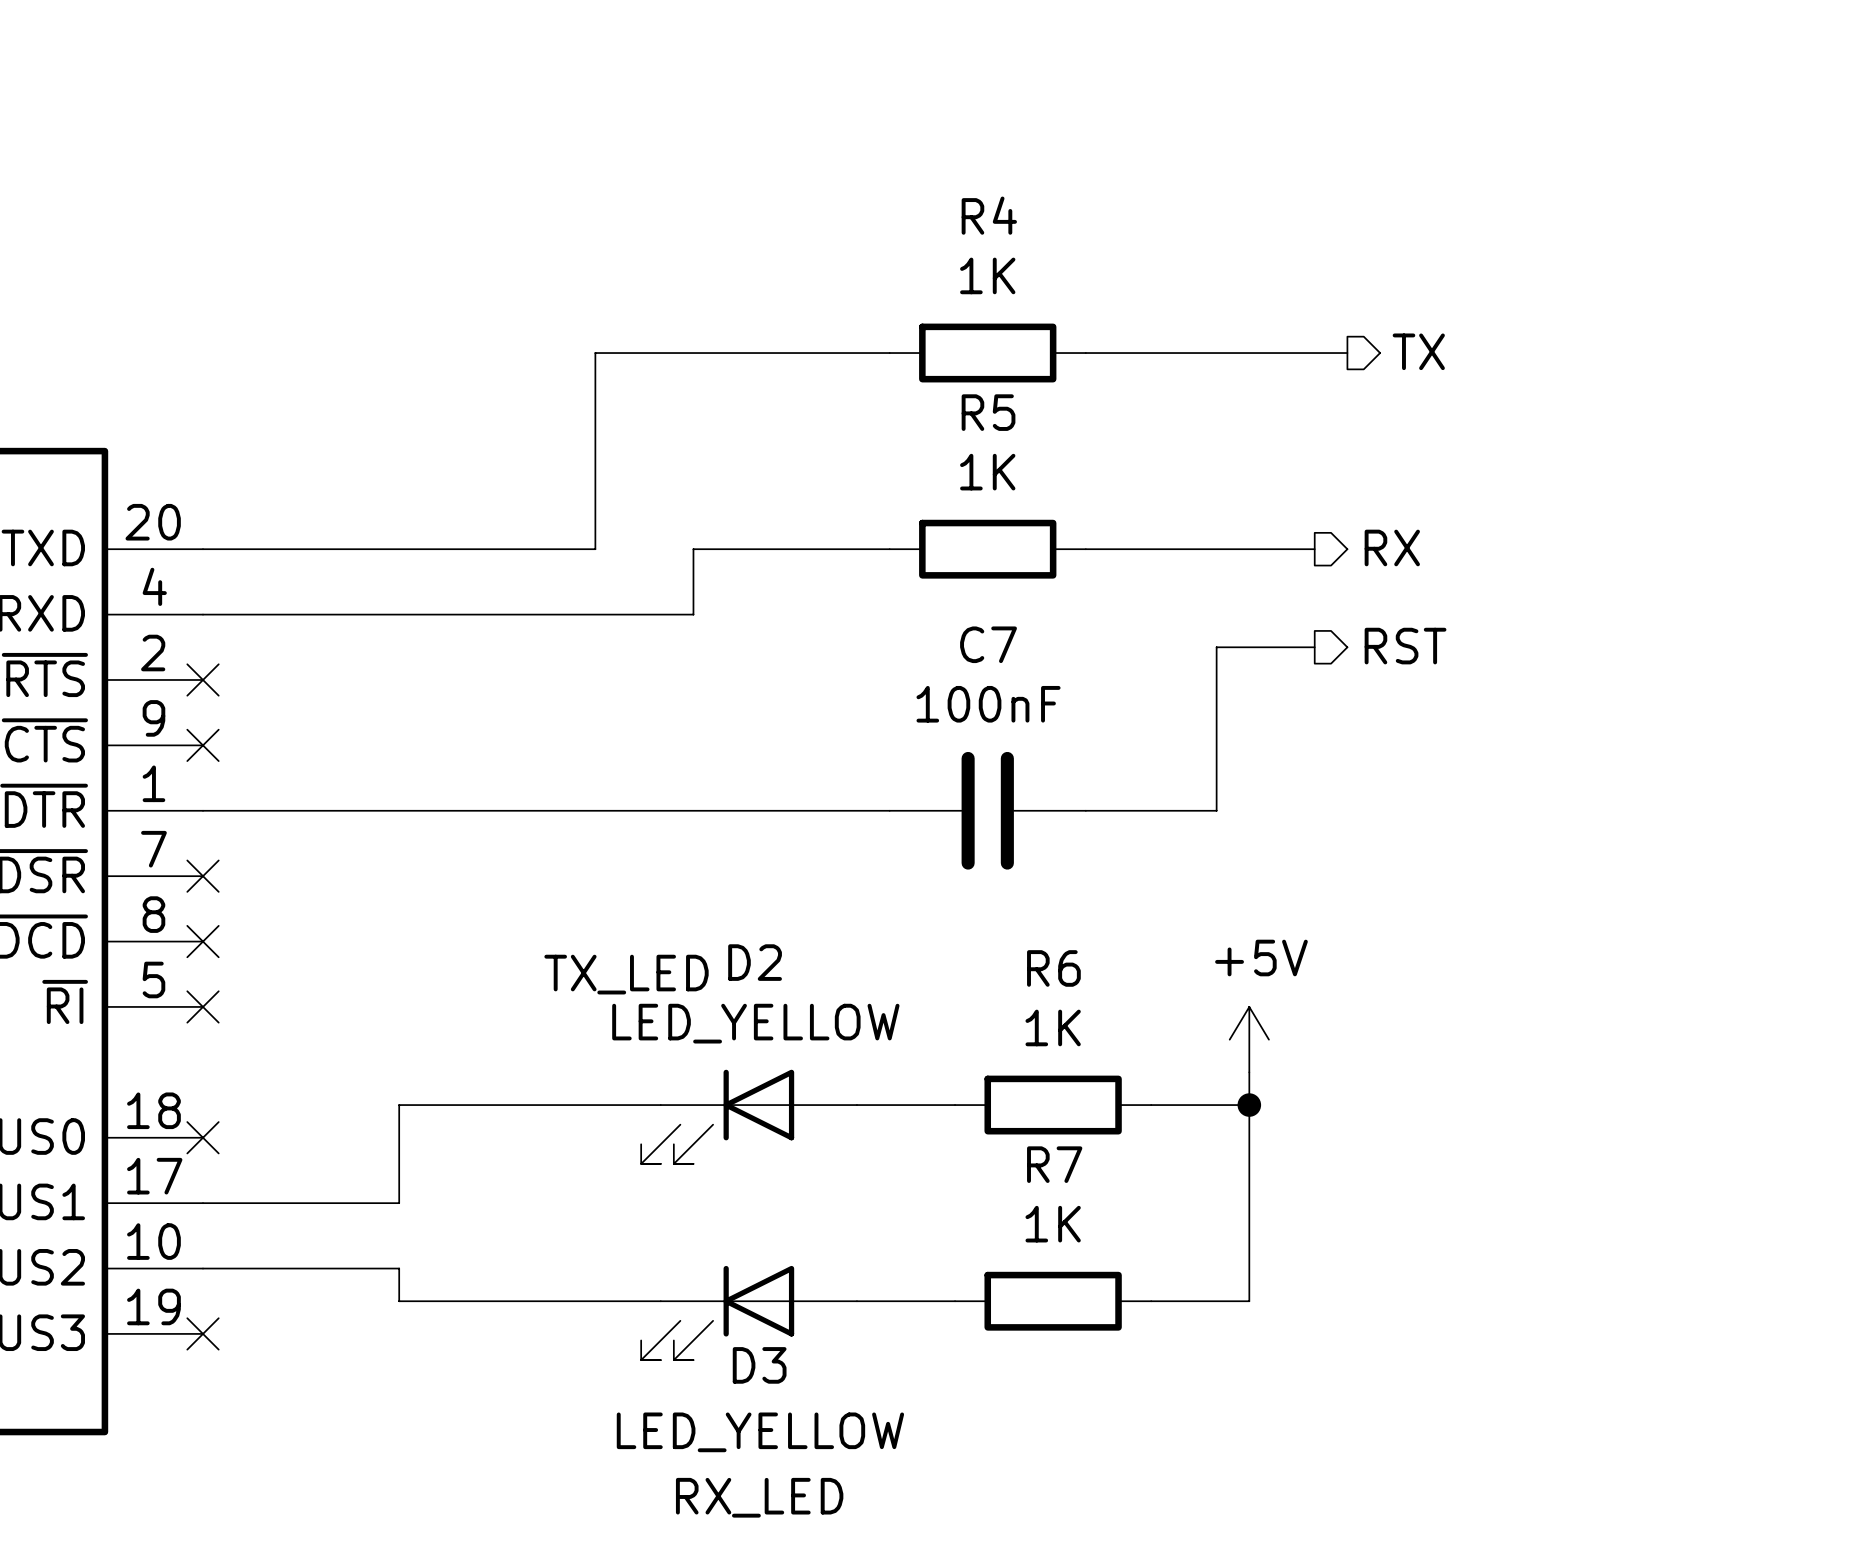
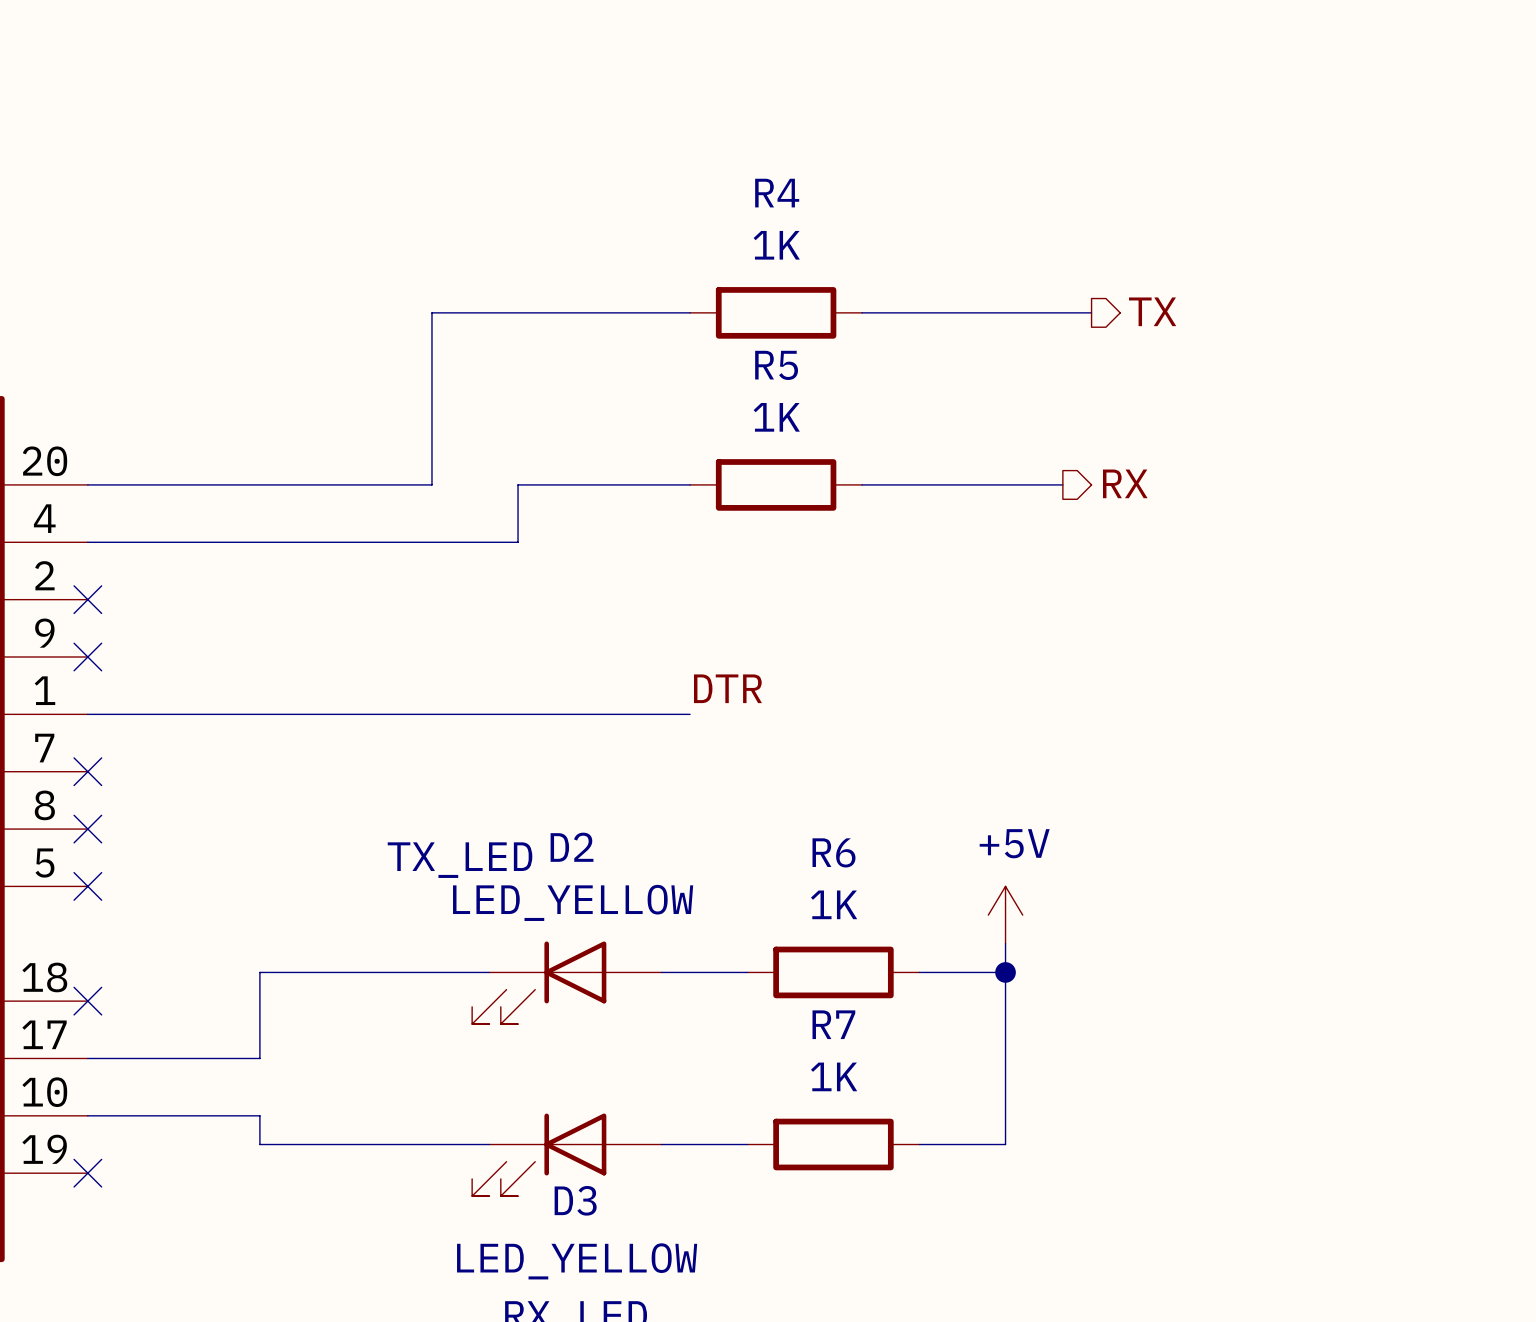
hierarchical label: RST (1405, 646) -> none
wire: (1314, 647) (1216, 647) (1216, 810) (1085, 810) -> none
label: none -> DTR (727, 688)
C7: 100nF (987, 810) -> none

